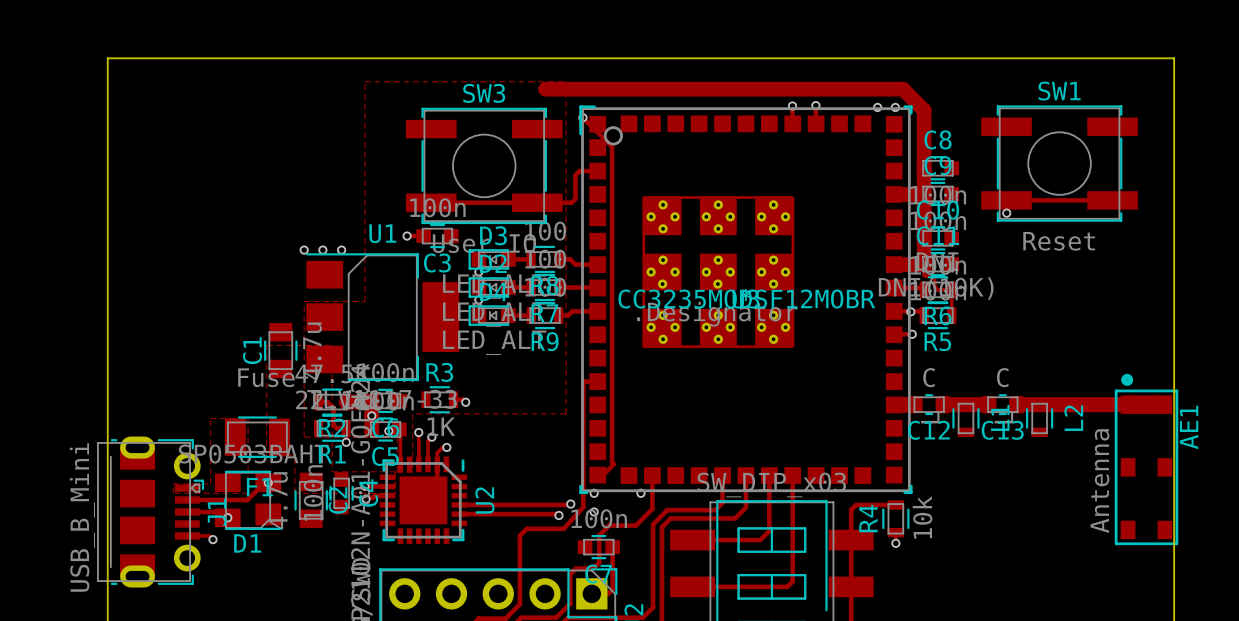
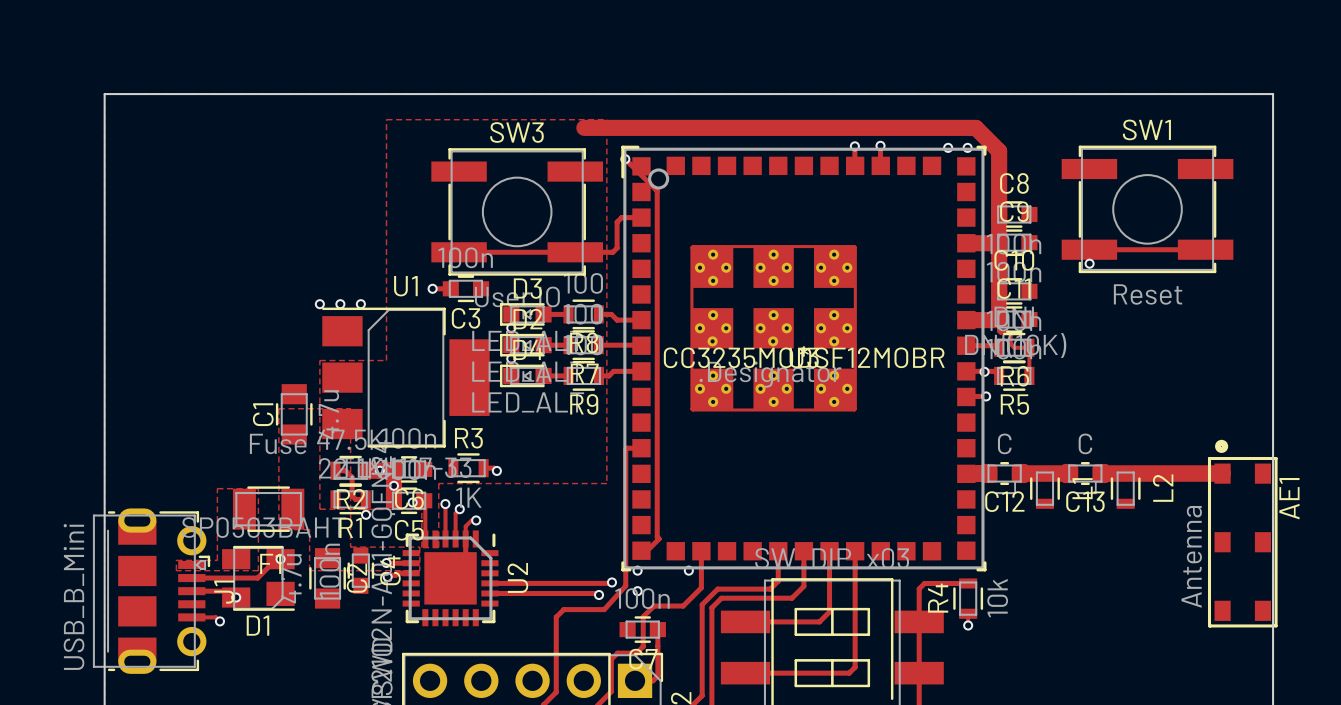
track: (1128, 404) (1160, 404) -> none

